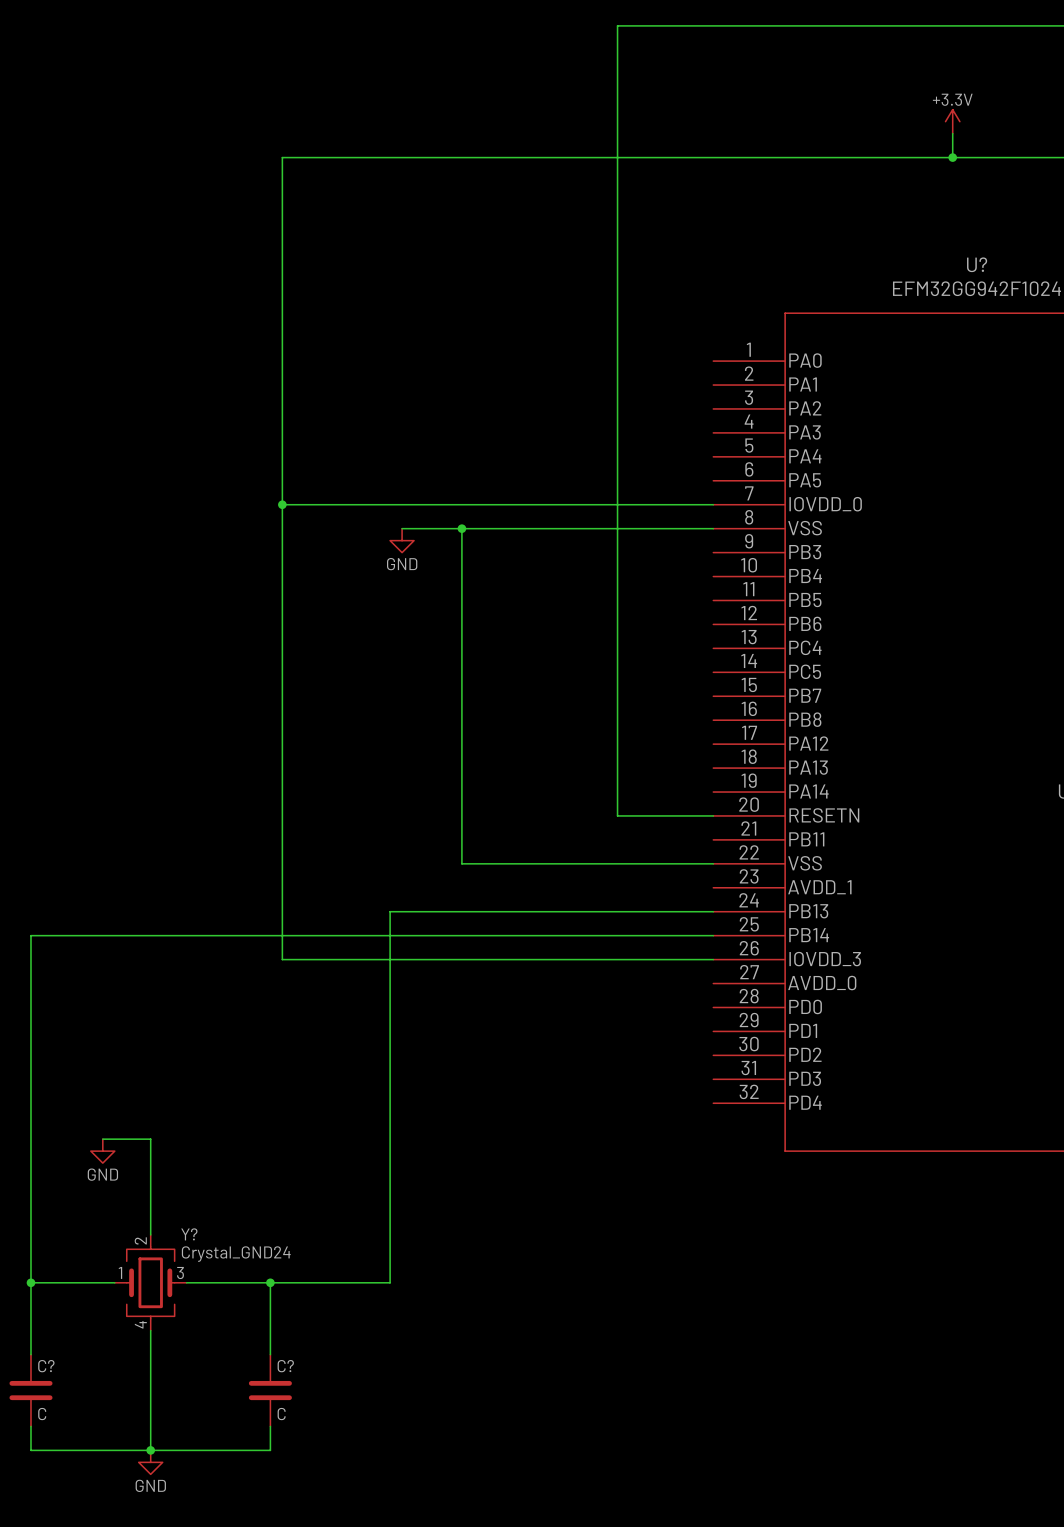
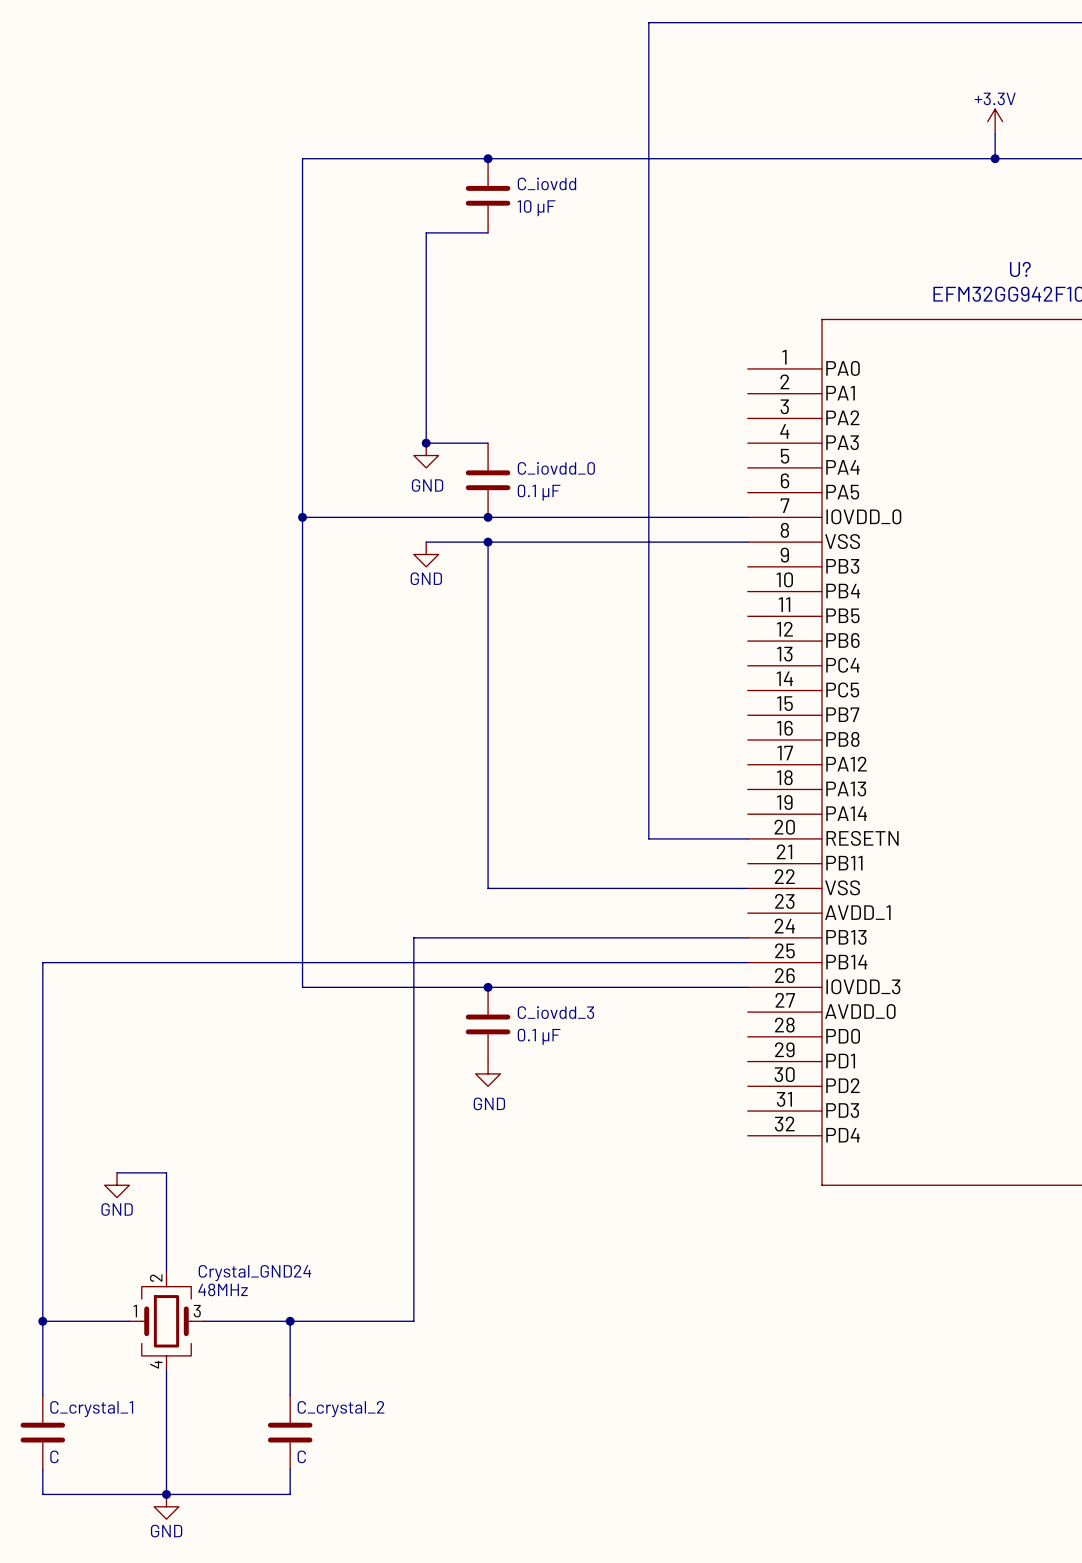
junction: none -> (488, 158)
C_iovdd: none -> 10 µF (488, 195)
wire: none -> (488, 232) (426, 232) (426, 443) (488, 443)
junction: none -> (426, 443)
power symbol: none -> GND (426, 455)
C_iovdd_0: none -> 0.1 µF (488, 480)
junction: none -> (488, 517)
junction: none -> (488, 987)
C_iovdd_3: none -> 0.1 µF (488, 1024)
power symbol: none -> GND (488, 1073)
Y? name: Y? (189, 1234) -> Crystal_GND24 (254, 1273)
Y? value: Crystal_GND24 (236, 1254) -> 48MHz (223, 1289)
C? name: C? (46, 1366) -> C_crystal_1 (91, 1409)
C? name: C? (285, 1366) -> C_crystal_2 (341, 1409)

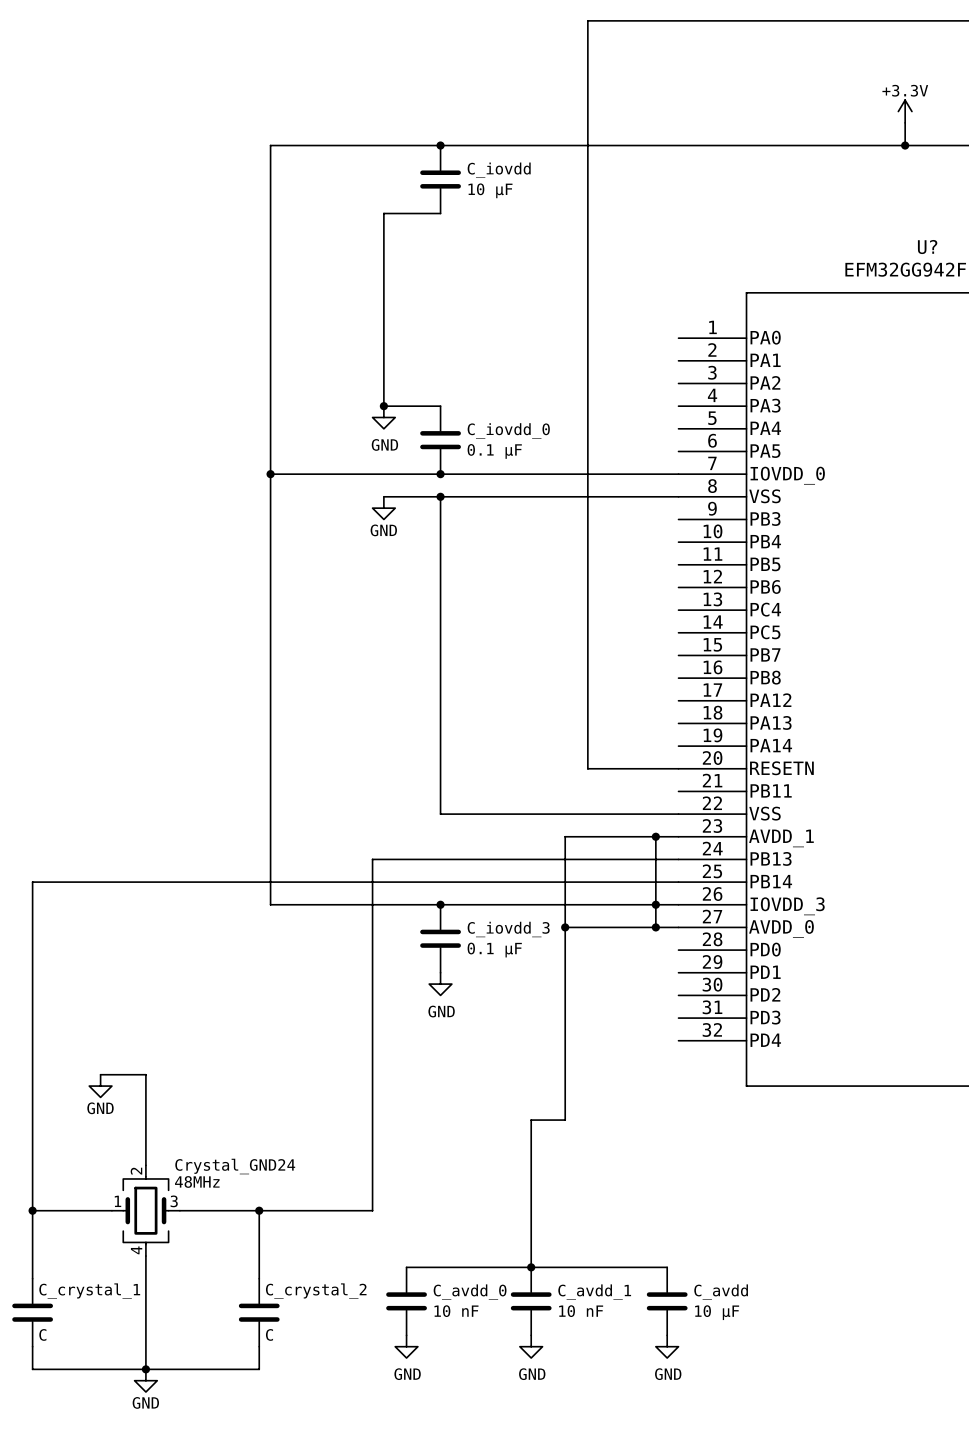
wire: none -> (655, 836) (655, 927)
junction: none -> (655, 836)
wire: none -> (678, 836) (565, 836) (565, 1120) (531, 1120) (531, 1267)
junction: none -> (655, 904)
wire: none -> (565, 927) (678, 927)
junction: none -> (565, 927)
junction: none -> (655, 927)
wire: none -> (406, 1267) (667, 1267)
junction: none -> (531, 1267)
C_avdd_0: none -> 10 nF (406, 1301)
C_avdd_1: none -> 10 nF (531, 1301)
C_avdd: none -> 10 µF (667, 1301)
power symbol: none -> GND (406, 1346)
power symbol: none -> GND (531, 1346)
power symbol: none -> GND (667, 1346)

